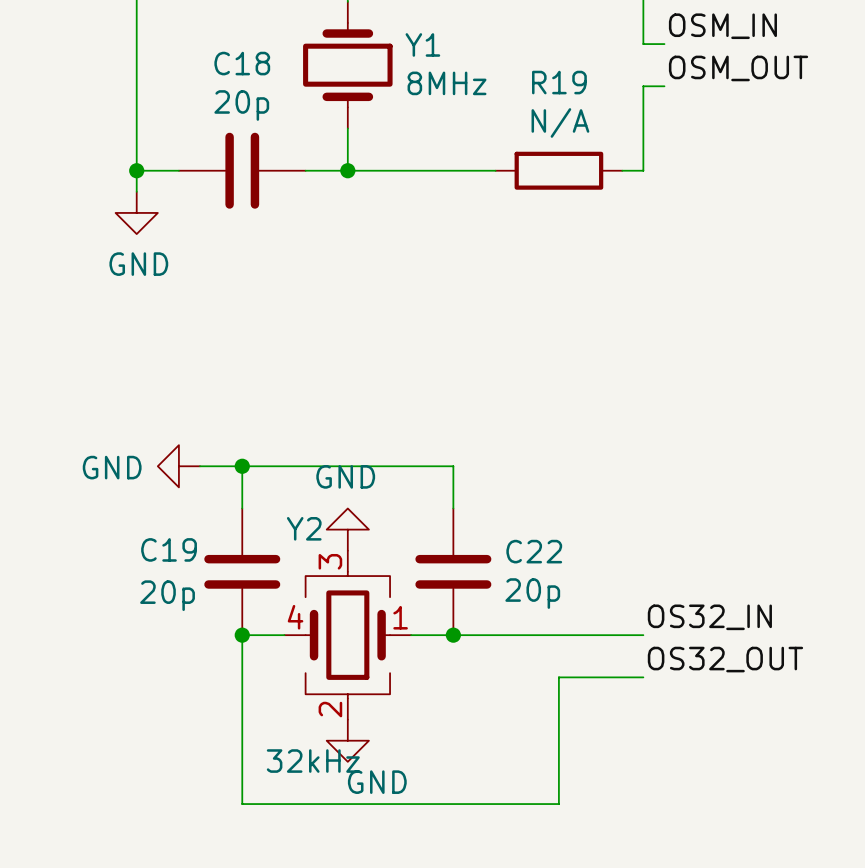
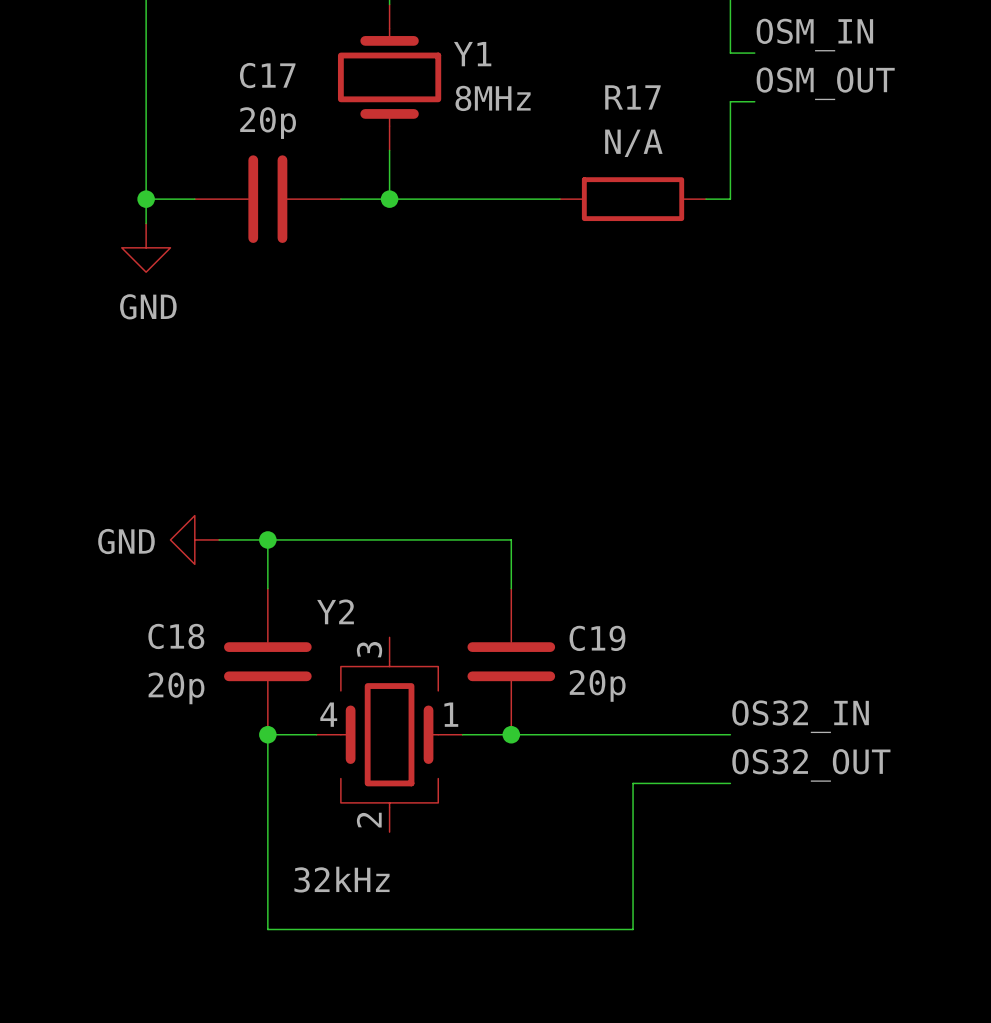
C18 name: C18 (242, 63) -> C17 (267, 75)
R19 name: R19 (559, 82) -> R17 (632, 97)
power symbol: GND (347, 529) -> none
C19 name: C19 (169, 549) -> C18 (176, 636)
C22 name: C22 (534, 551) -> C19 (597, 638)
power symbol: GND (347, 740) -> none

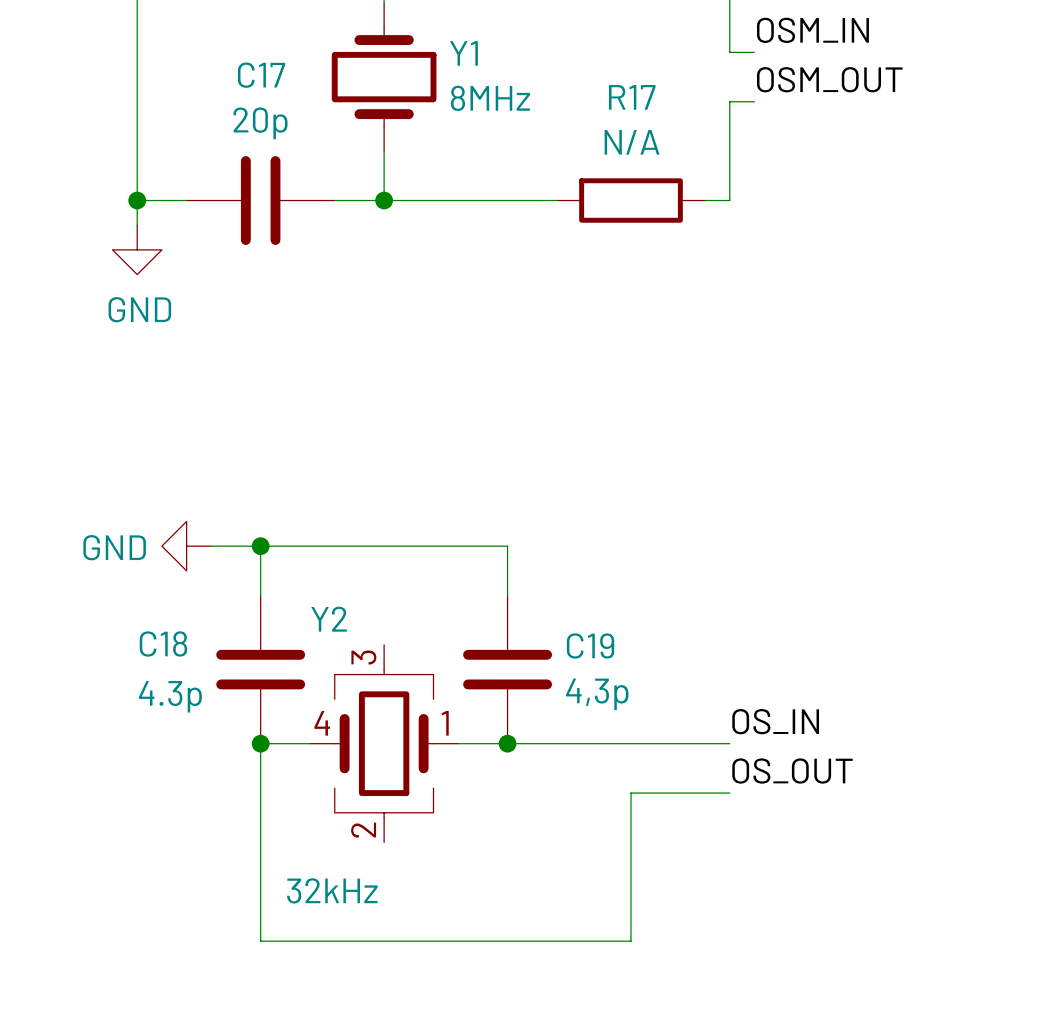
C19 value: 20p (597, 685) -> 4,3p (597, 694)
C18 value: 20p (176, 688) -> 4.3p (170, 696)
label: OS32_IN (800, 716) -> OS_IN (775, 721)
label: OS32_OUT (811, 765) -> OS_OUT (792, 771)

